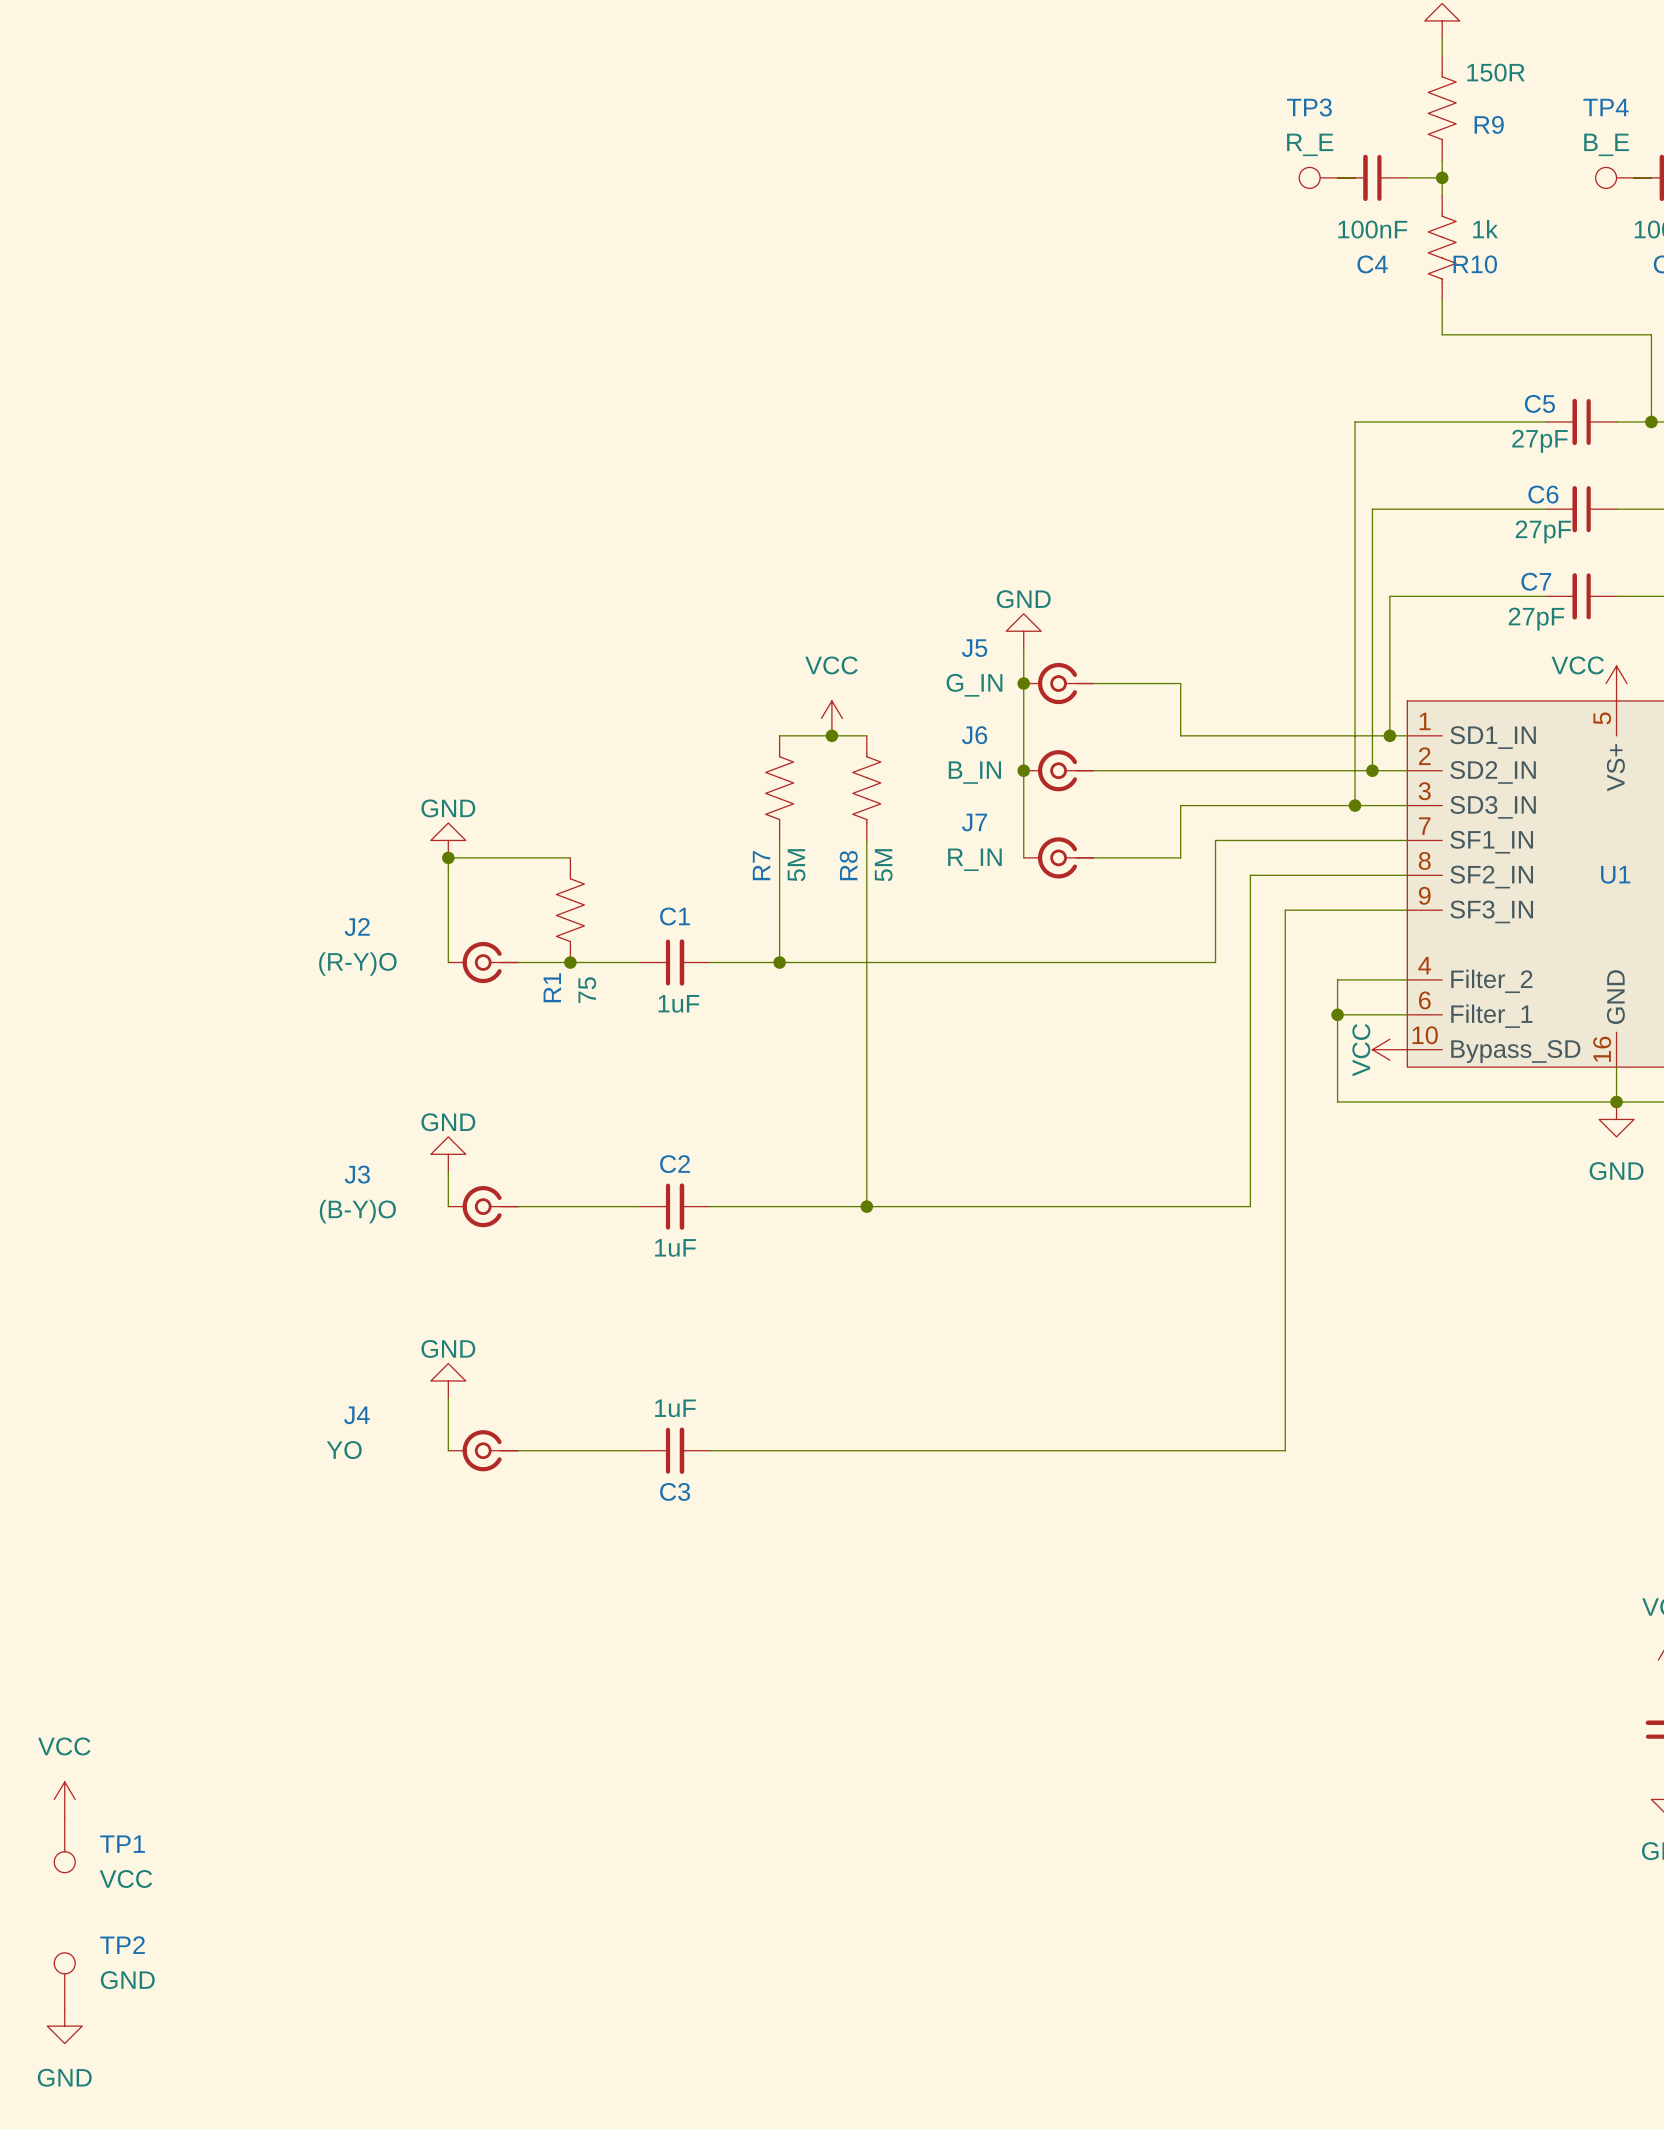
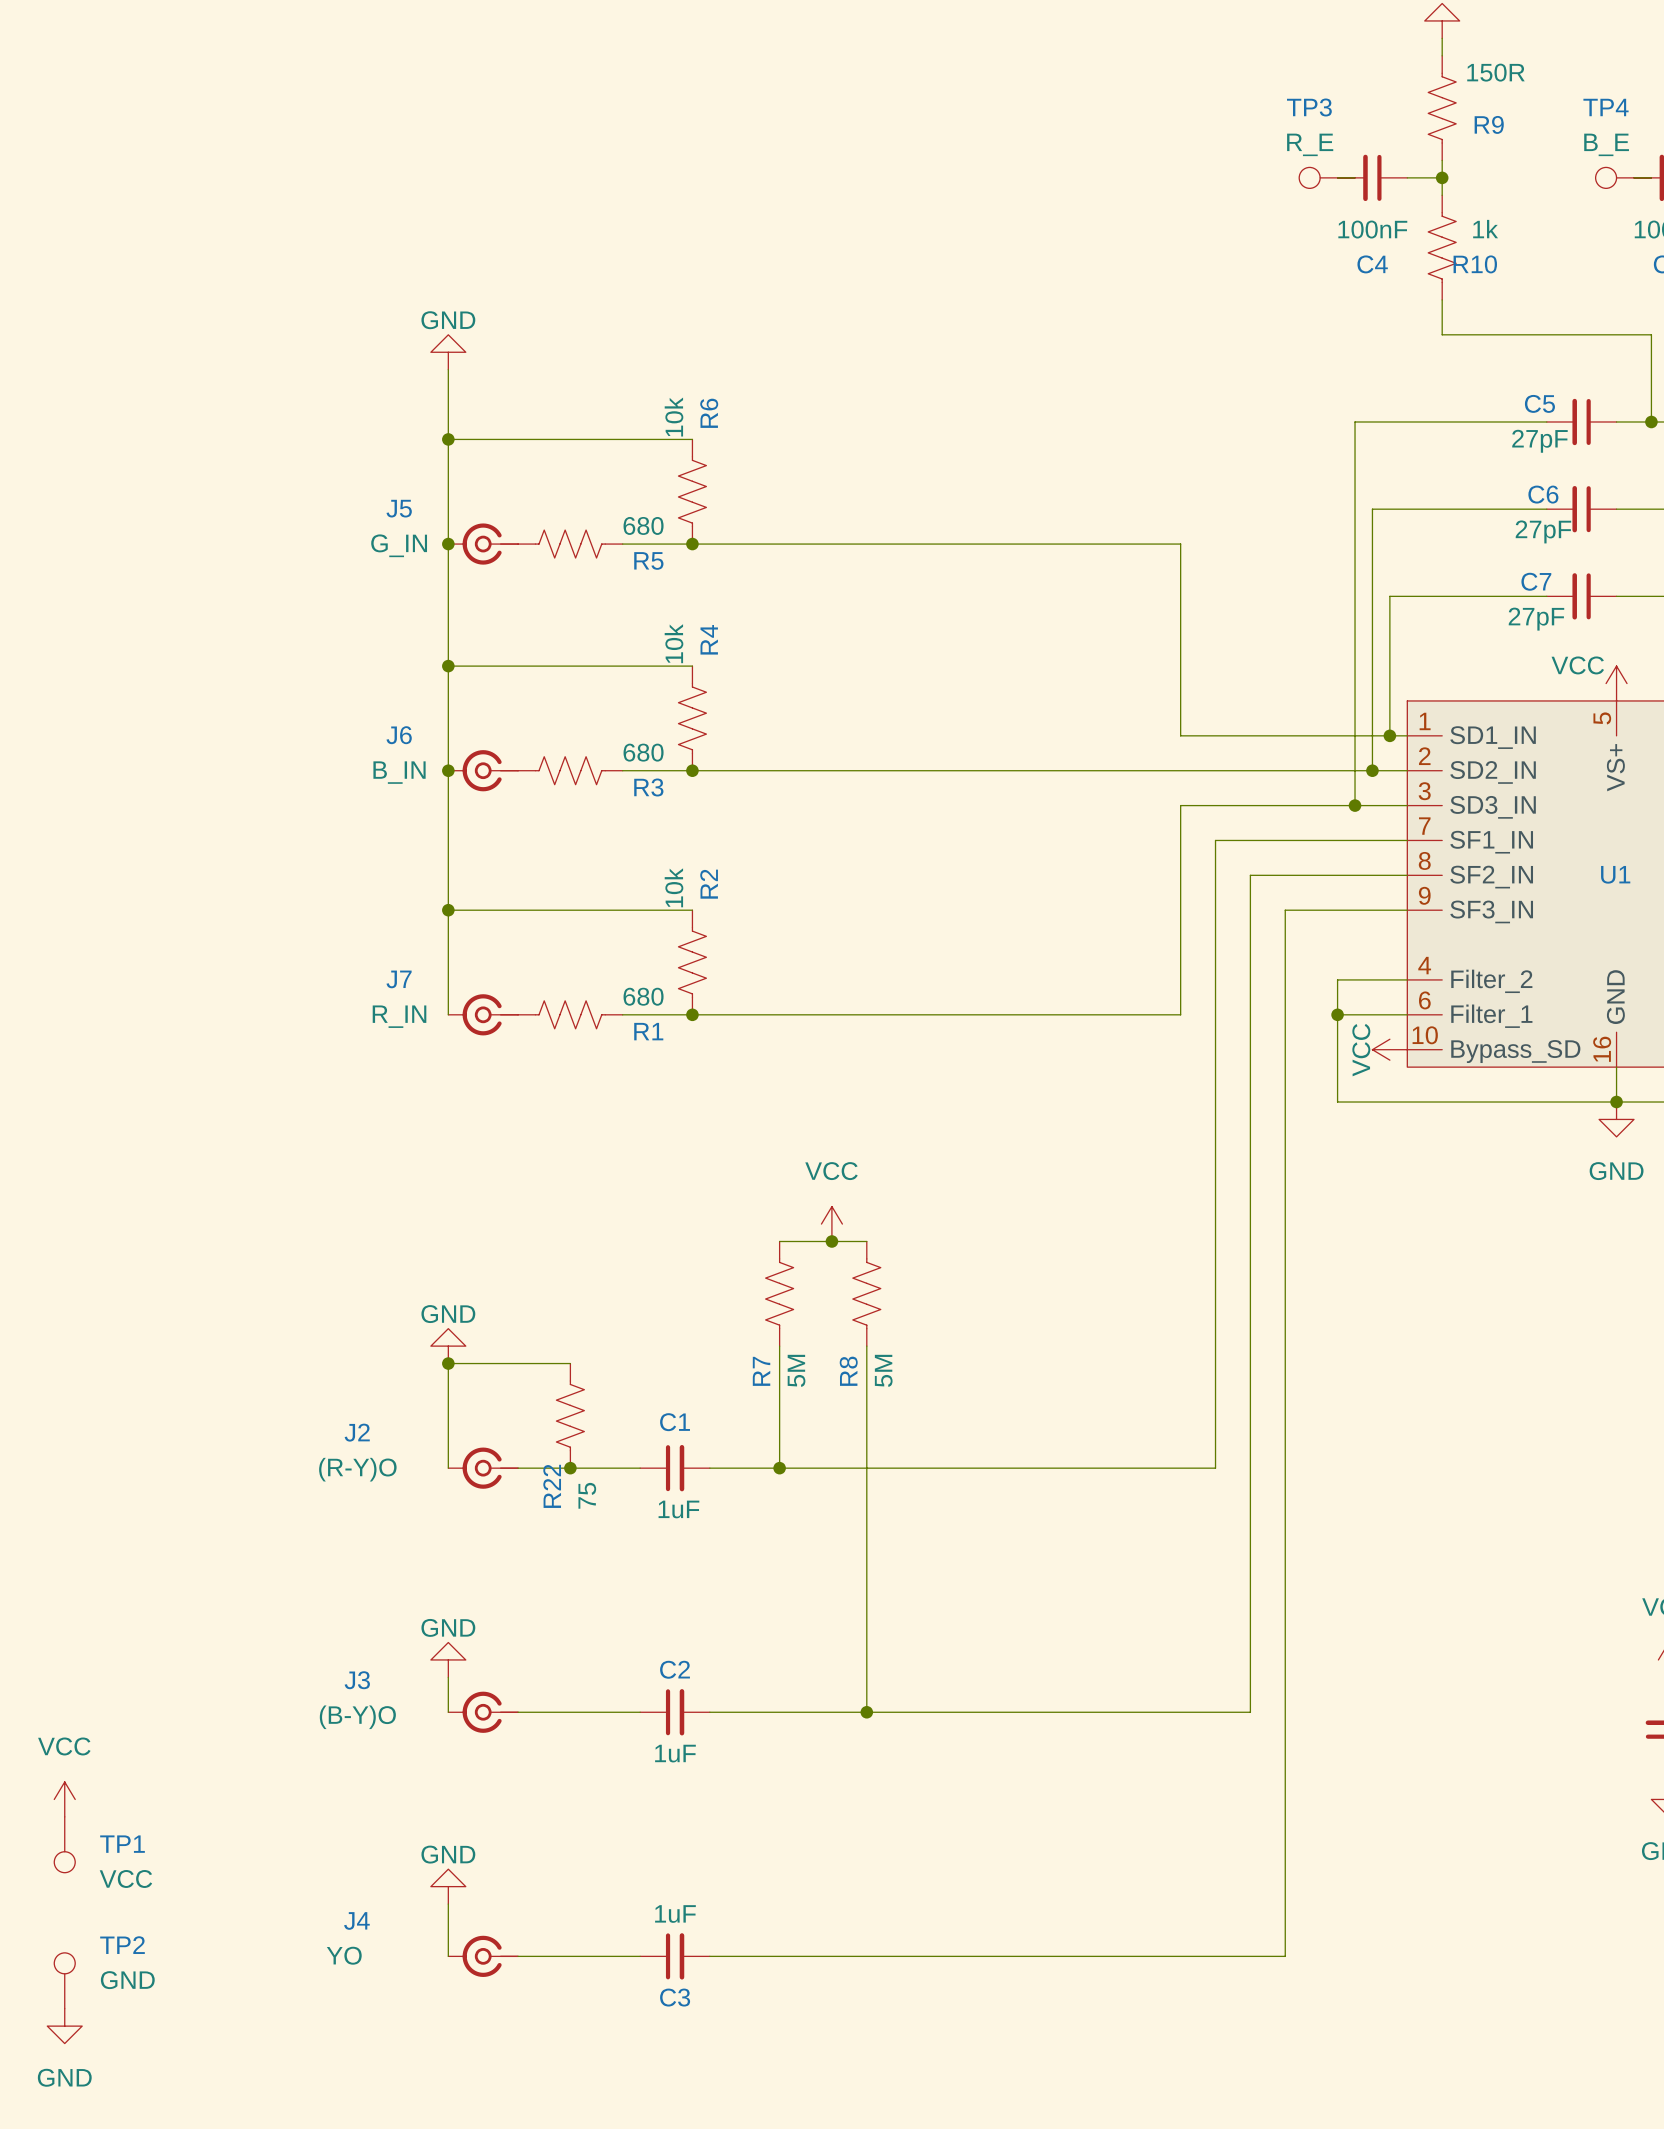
power symbol: none -> GND (448, 352)
wire: none -> (448, 439) (692, 439)
junction: none -> (448, 439)
R6: none -> 10k (692, 491)
junction: none -> (448, 544)
R5: none -> 680 (570, 544)
junction: none -> (692, 544)
power symbol: GND (1023, 631) -> none
wire: (1023, 648) (1023, 857) -> none
wire: none -> (448, 666) (692, 666)
junction: none -> (448, 666)
junction: (1023, 683) -> none
J5 position: (1058, 683) -> (483, 544)
wire: (1093, 683) (1180, 683) -> (622, 544) (1180, 544) (1180, 683)
R4: none -> 10k (692, 718)
power symbol: VCC (831, 718) -> none
wire: (779, 735) (866, 735) -> none
junction: (831, 735) -> none
junction: none -> (448, 770)
R3: none -> 680 (570, 770)
wire: none -> (622, 770) (1093, 770)
junction: none -> (692, 770)
junction: (1023, 770) -> none
J6 position: (1058, 770) -> (483, 770)
R7 position: (779, 788) -> (779, 1293)
R8 position: (866, 788) -> (866, 1293)
power symbol: GND (448, 840) -> none
wire: (779, 840) (779, 962) -> none
wire: (866, 840) (866, 1206) -> none
wire: (448, 857) (570, 857) -> (448, 857) (448, 369)
junction: (448, 857) -> none
J7 position: (1058, 857) -> (483, 1014)
wire: (1093, 857) (1180, 857) -> (622, 1014) (1180, 1014) (1180, 857)
wire: none -> (448, 910) (692, 910)
junction: none -> (448, 910)
R1 rotation: 0° (570, 910) -> 90° clockwise (570, 1014)
R1 position: (570, 910) -> (570, 1014)
wire: none -> (448, 962) (448, 1014)
J2 position: (483, 962) -> (483, 1468)
wire: (518, 962) (640, 962) -> none
junction: (570, 962) -> none
C1 position: (675, 962) -> (675, 1468)
R2: none -> 10k (692, 962)
wire: (709, 962) (1215, 962) -> (709, 1468) (1215, 1468) (1215, 962)
junction: (779, 962) -> none
R1 name position: R1 (552, 987) -> R1 (648, 1031)
R1 value: 75 (587, 990) -> 680 (643, 996)
junction: none -> (692, 1014)
power symbol: GND (448, 1154) -> none
wire: (448, 1171) (448, 1206) -> none
J3 position: (483, 1206) -> (483, 1712)
wire: (518, 1206) (640, 1206) -> (518, 1468) (640, 1468)
C2 position: (675, 1206) -> (675, 1712)
wire: (709, 1206) (1250, 1206) -> (709, 1712) (1250, 1712) (1250, 1206)
junction position: (866, 1206) -> (831, 1241)
power symbol: none -> VCC (831, 1224)
wire: none -> (779, 1241) (866, 1241)
wire: none -> (779, 1346) (779, 1468)
wire: none -> (866, 1346) (866, 1712)
junction: none -> (448, 1363)
wire: none -> (570, 1363) (448, 1363) (448, 1398)
power symbol position: GND (448, 1380) -> GND (448, 1346)
R22: none -> 75 (570, 1415)
wire: none -> (448, 1450) (448, 1468)
J4 position: (483, 1450) -> (483, 1956)
wire: (518, 1450) (640, 1450) -> (518, 1712) (640, 1712)
C3 position: (675, 1450) -> (675, 1956)
wire: (709, 1450) (1285, 1450) -> (709, 1956) (1285, 1956) (1285, 1450)
junction: none -> (570, 1468)
junction: none -> (779, 1468)
power symbol: none -> GND (448, 1659)
wire: none -> (448, 1677) (448, 1712)
junction: none -> (866, 1712)
power symbol: none -> GND (448, 1886)
wire: none -> (448, 1904) (448, 1956)
wire: none -> (518, 1956) (640, 1956)

